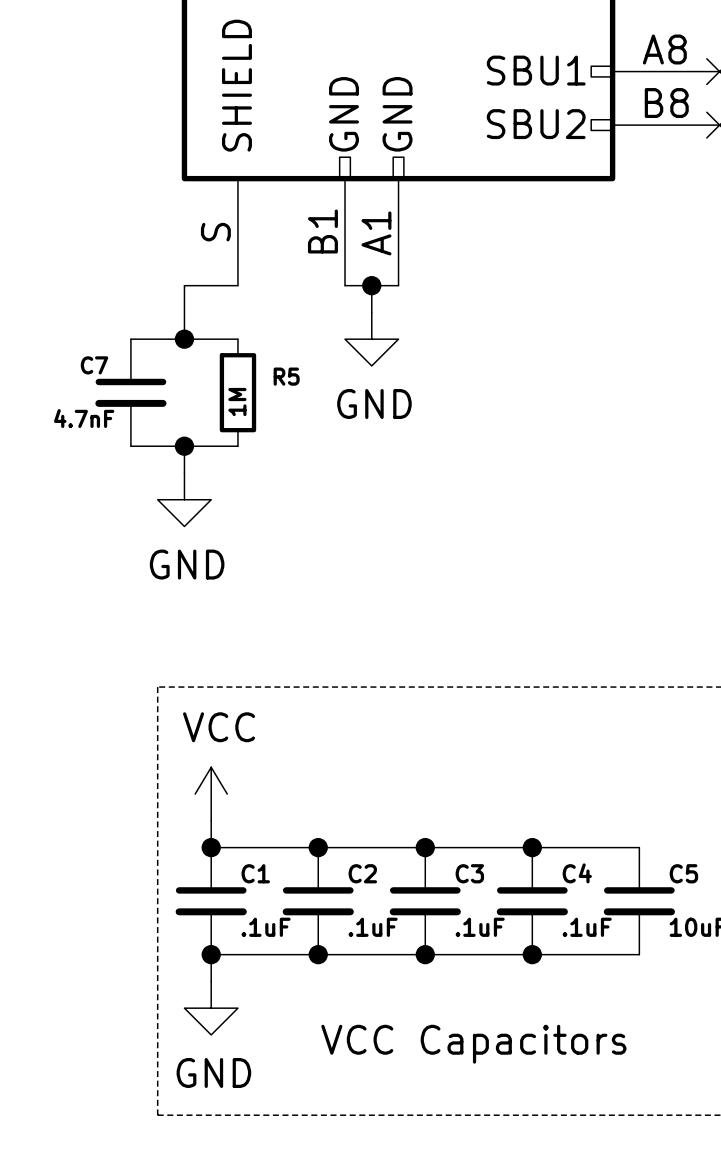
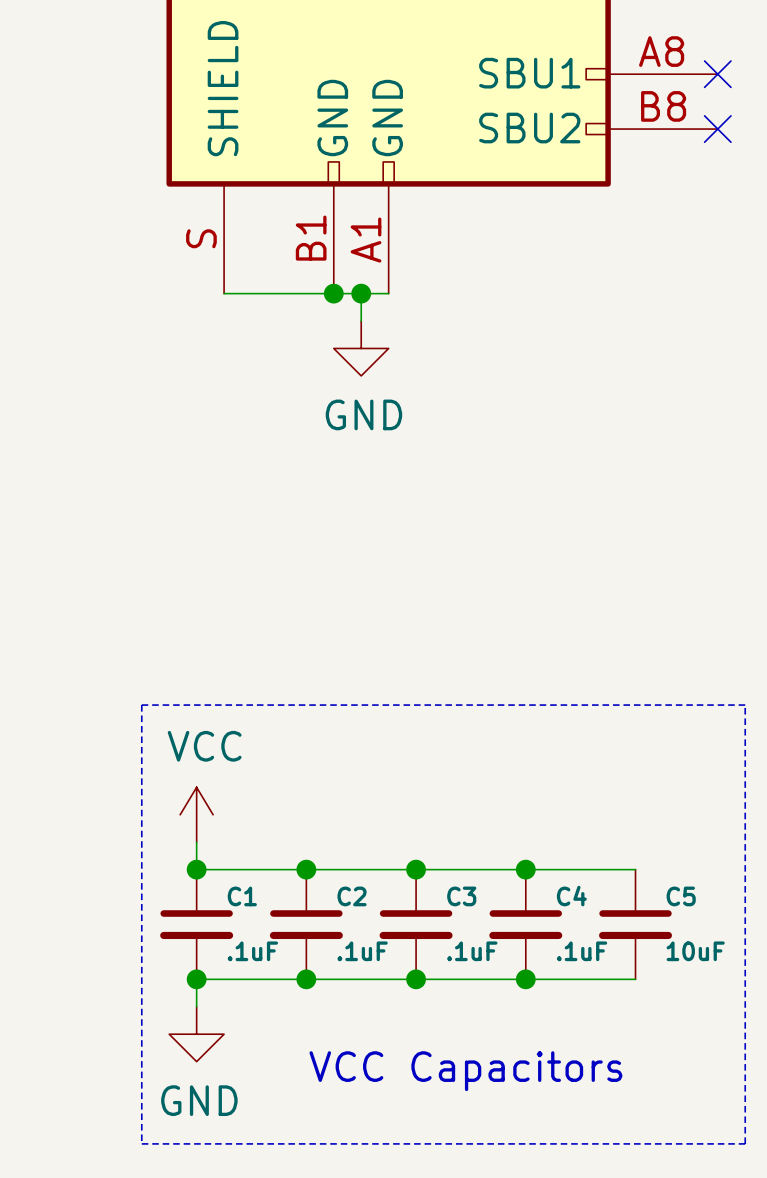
wire: (237, 285) (184, 285) (184, 339) -> (224, 293) (333, 293)
junction: none -> (333, 293)
wire: (130, 339) (237, 339) -> none
junction: (184, 339) -> none
C7: 4.7nF (130, 392) -> none
R5: 1M (237, 392) -> none
wire: (130, 446) (237, 446) -> none
wire: (184, 446) (184, 472) -> none
junction: (184, 446) -> none
power symbol: GND (184, 499) -> none

